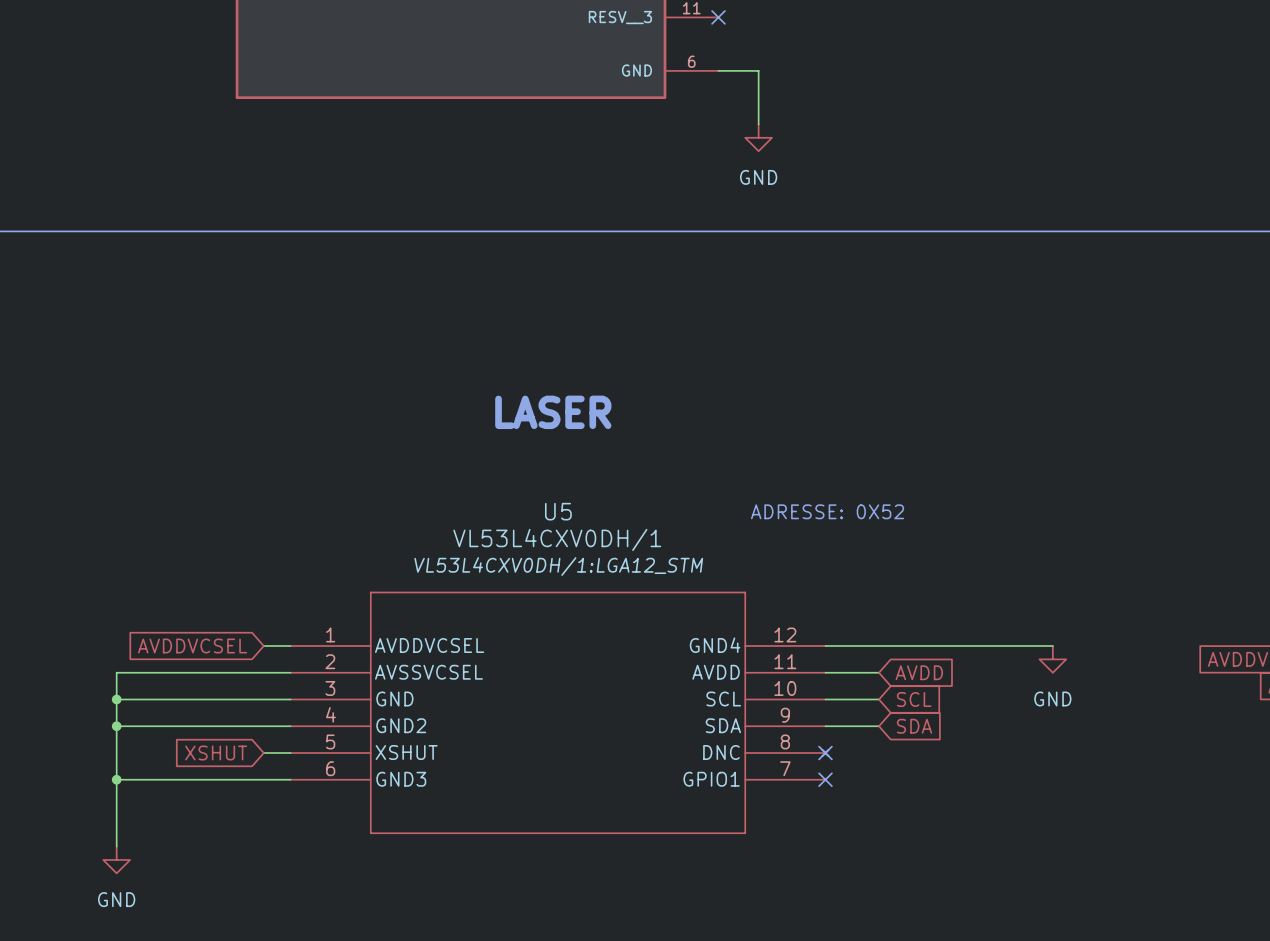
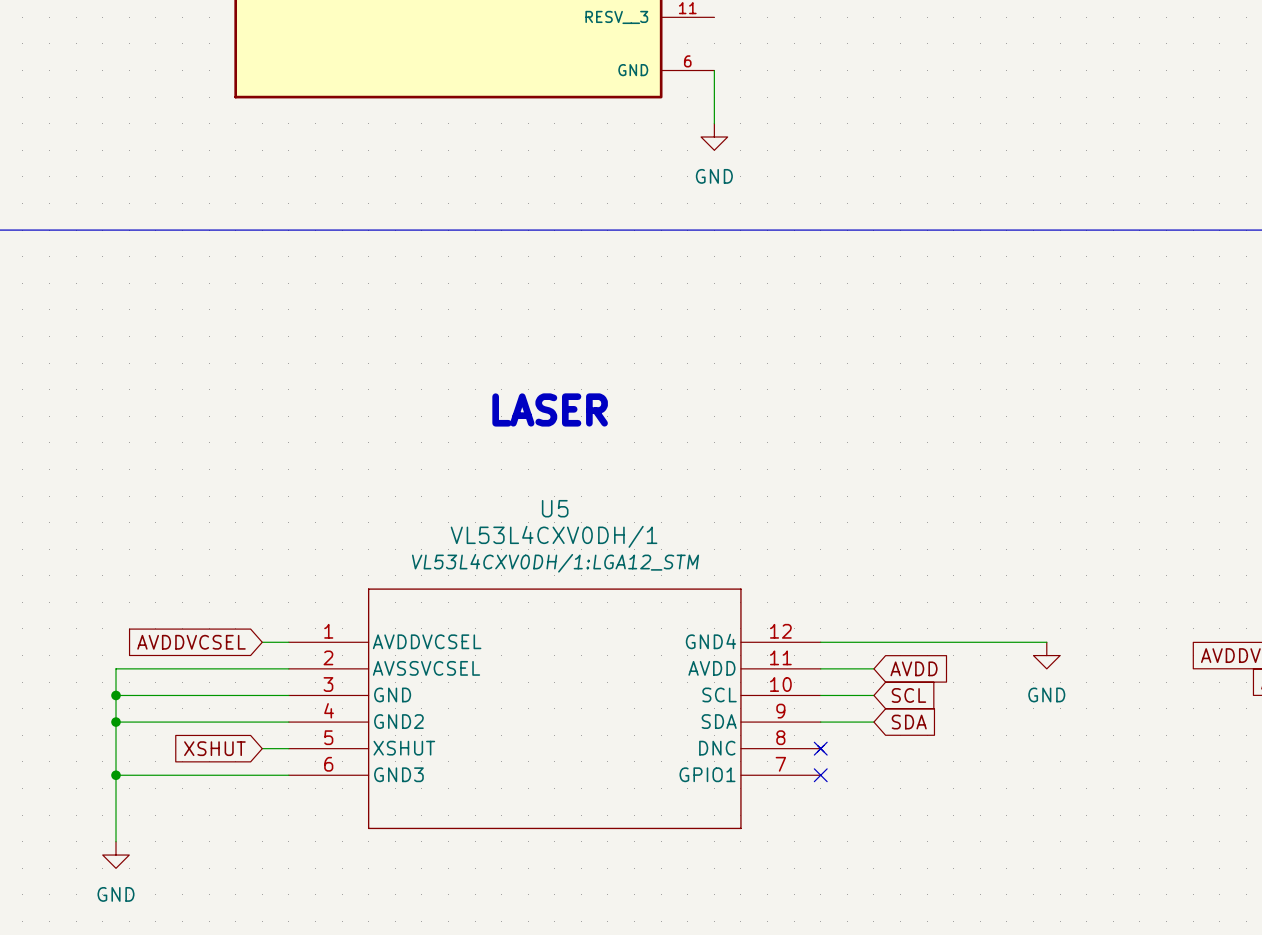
no-connect mark: (718, 17) -> none
wire: (718, 70) (758, 70) (758, 124) -> (714, 70) (714, 123)
power symbol position: GND (758, 137) -> GND (714, 136)
text: ADRESSE: 0X52 (827, 511) -> none

